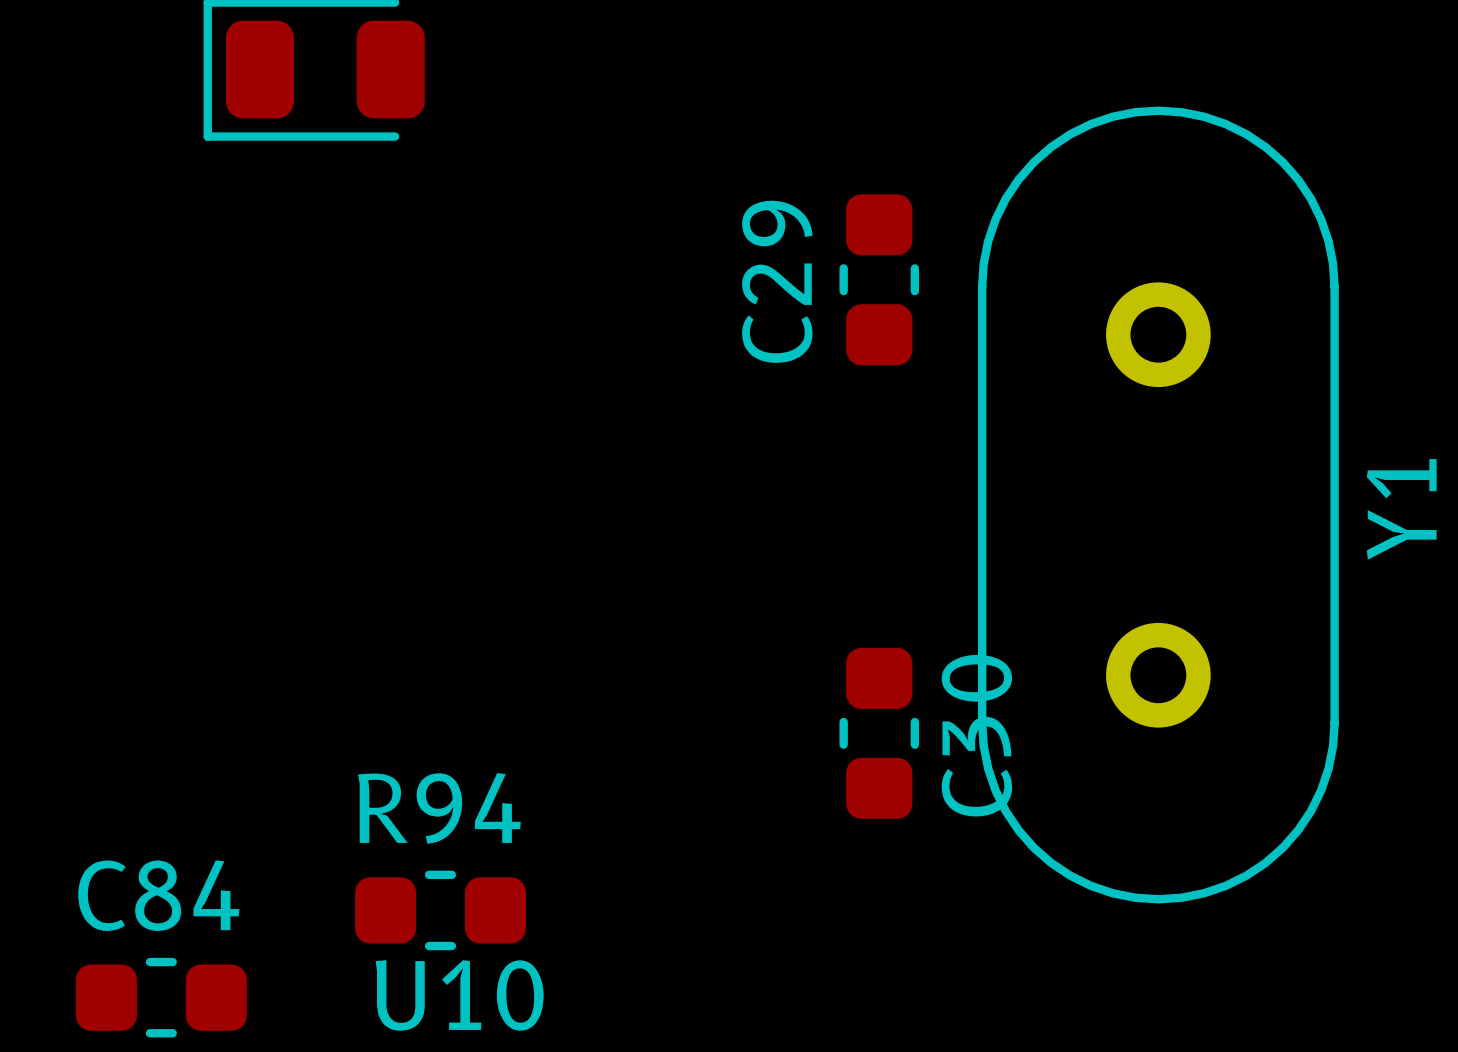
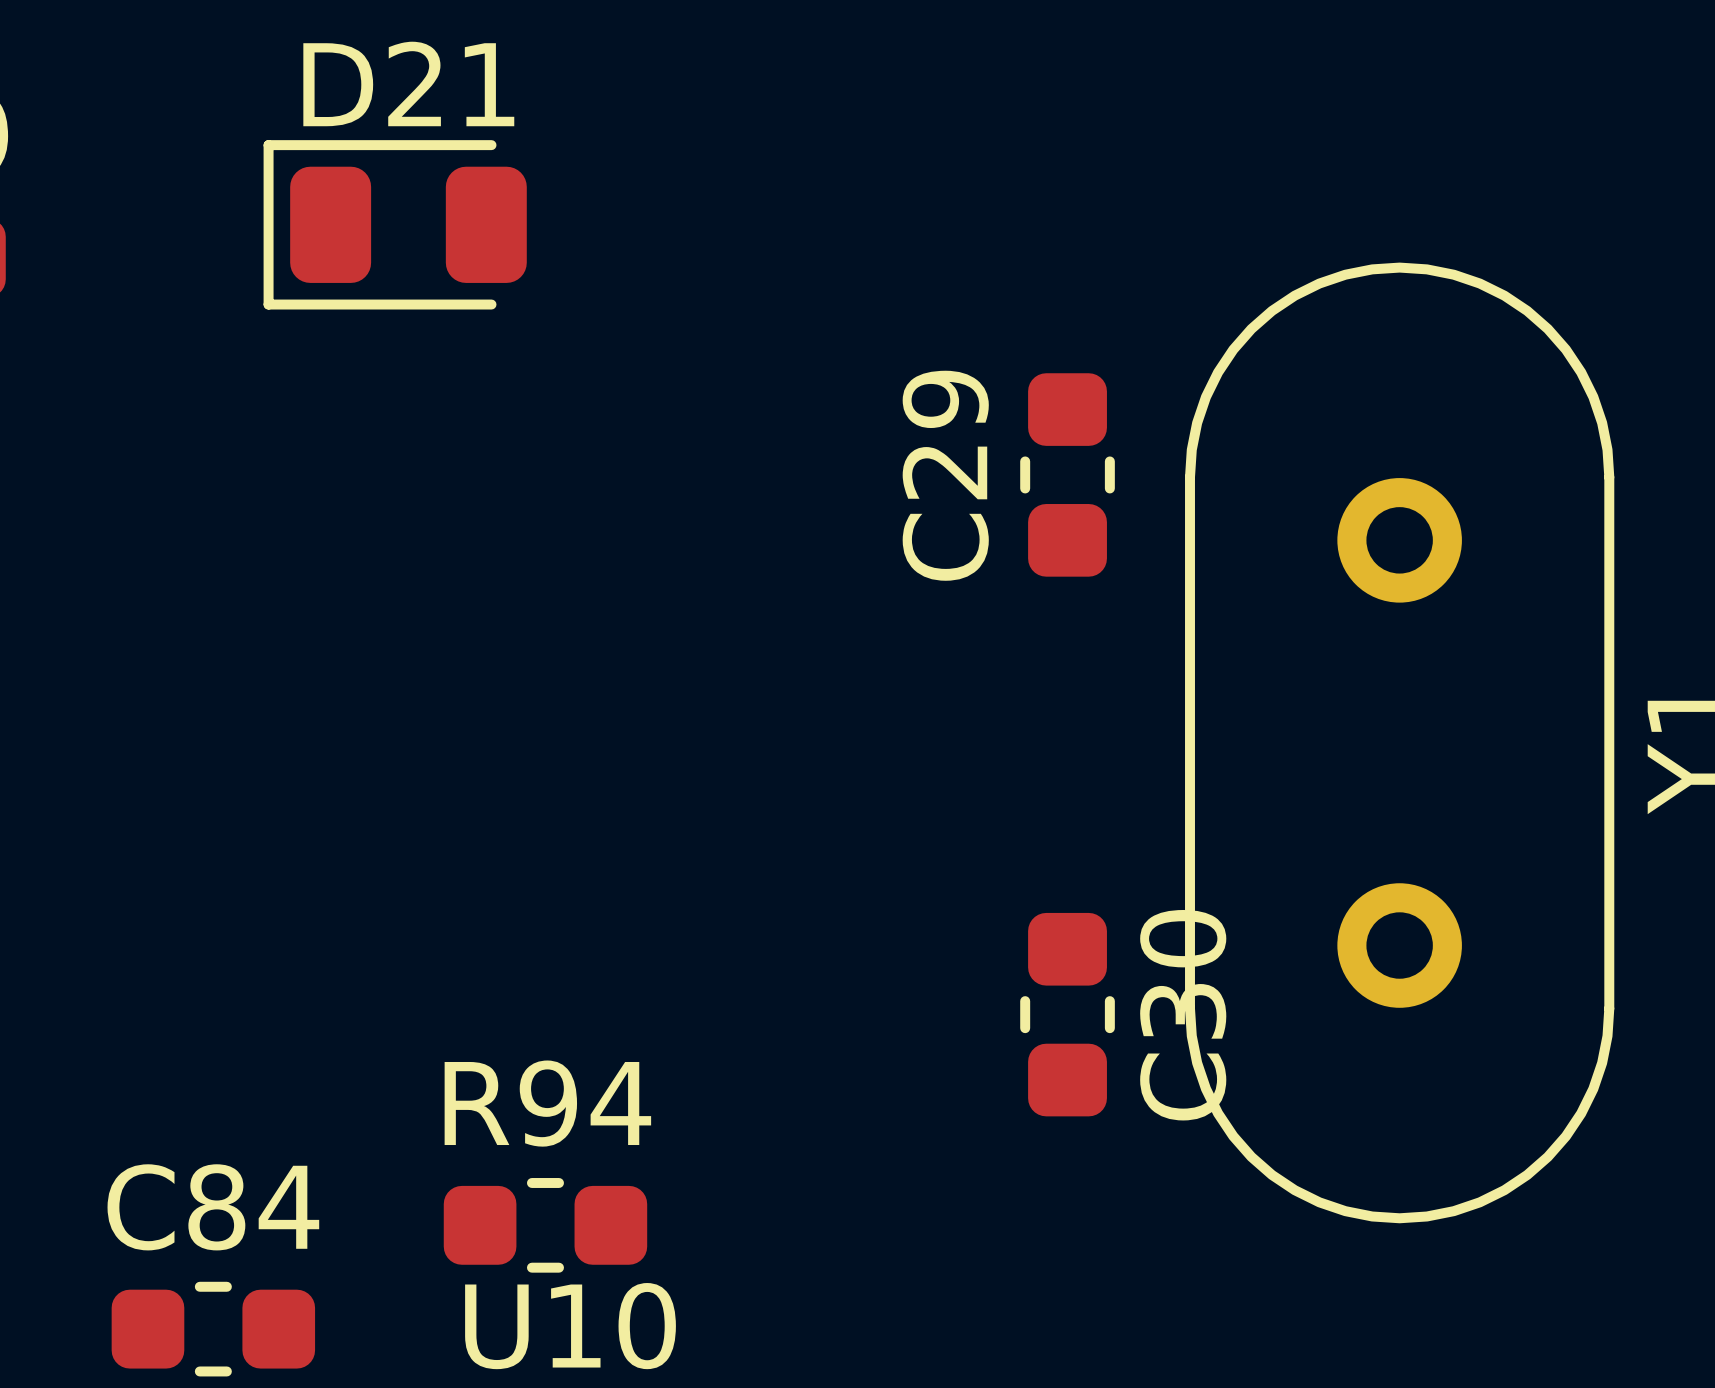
Y1 footprint: [977, 106, 1339, 904] -> [1185, 262, 1615, 1224]

